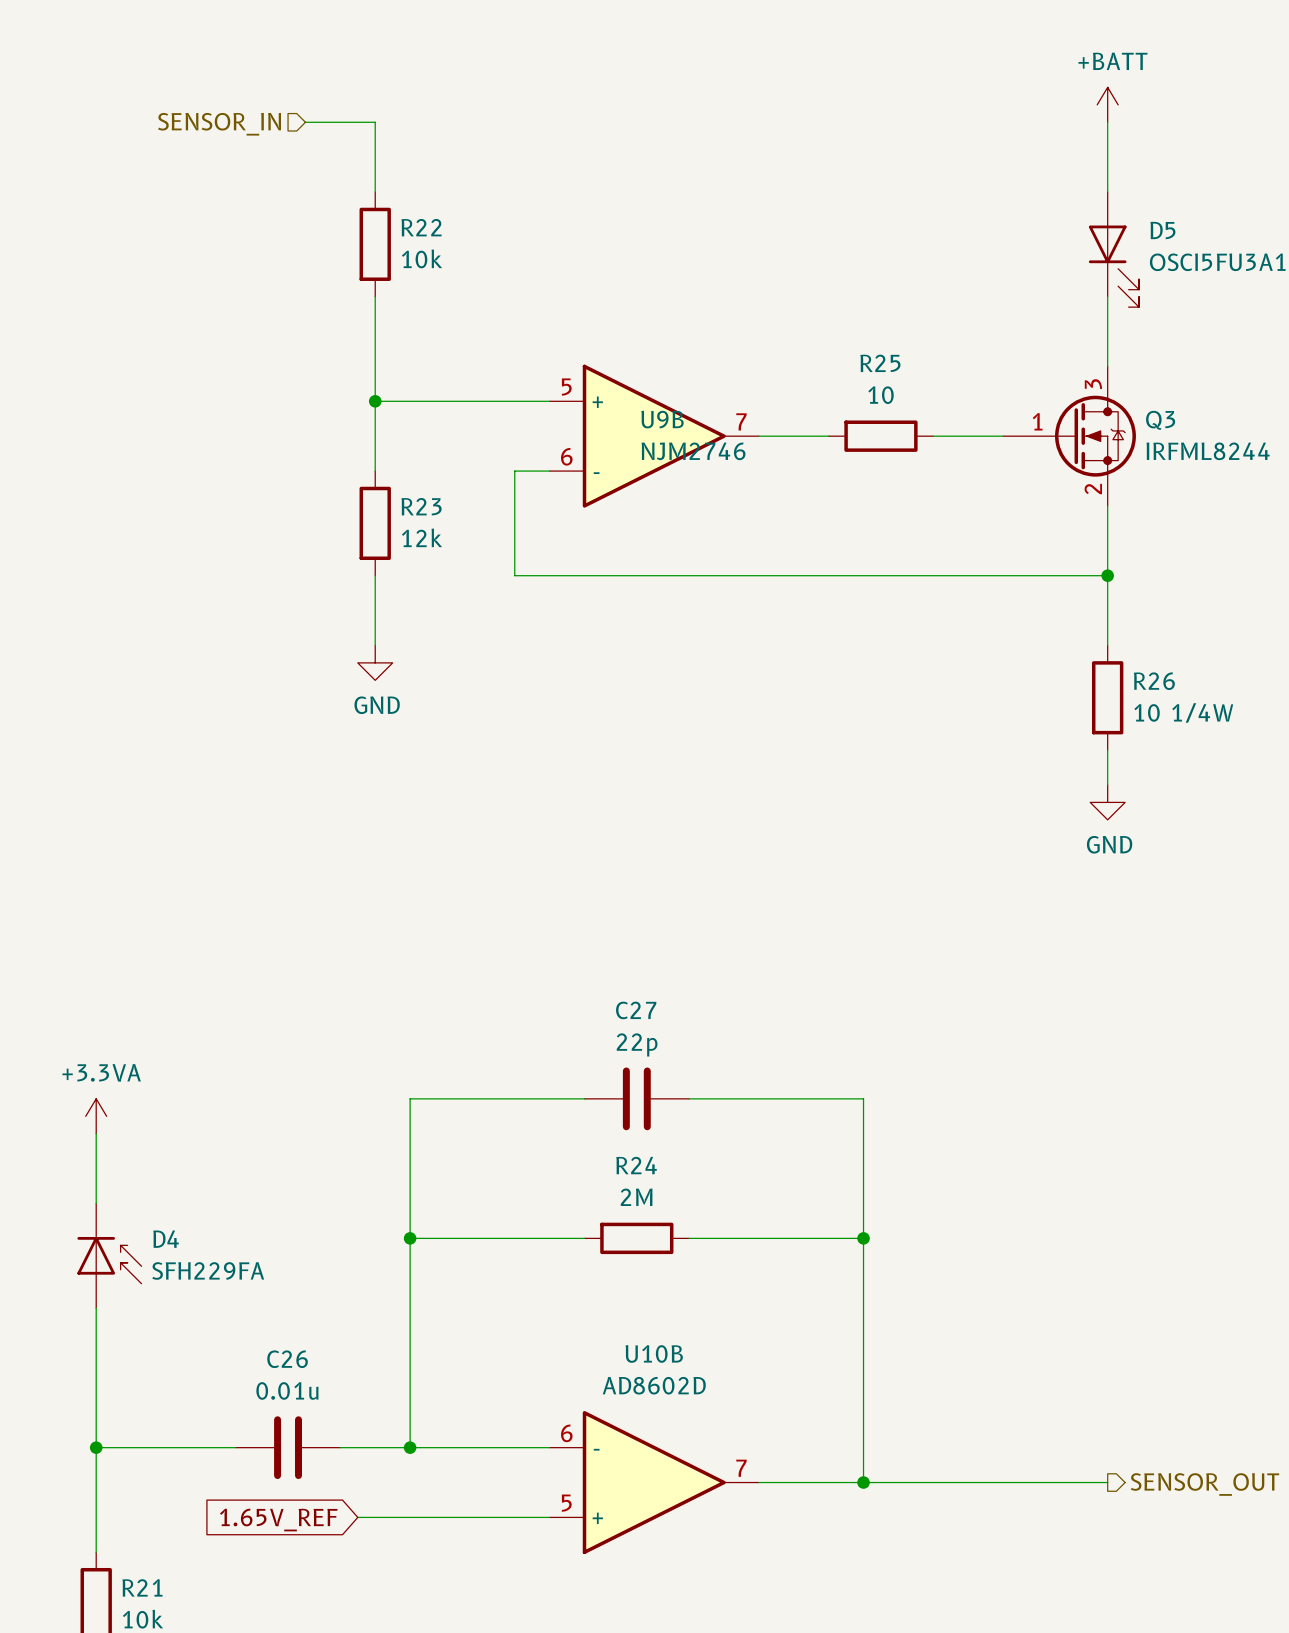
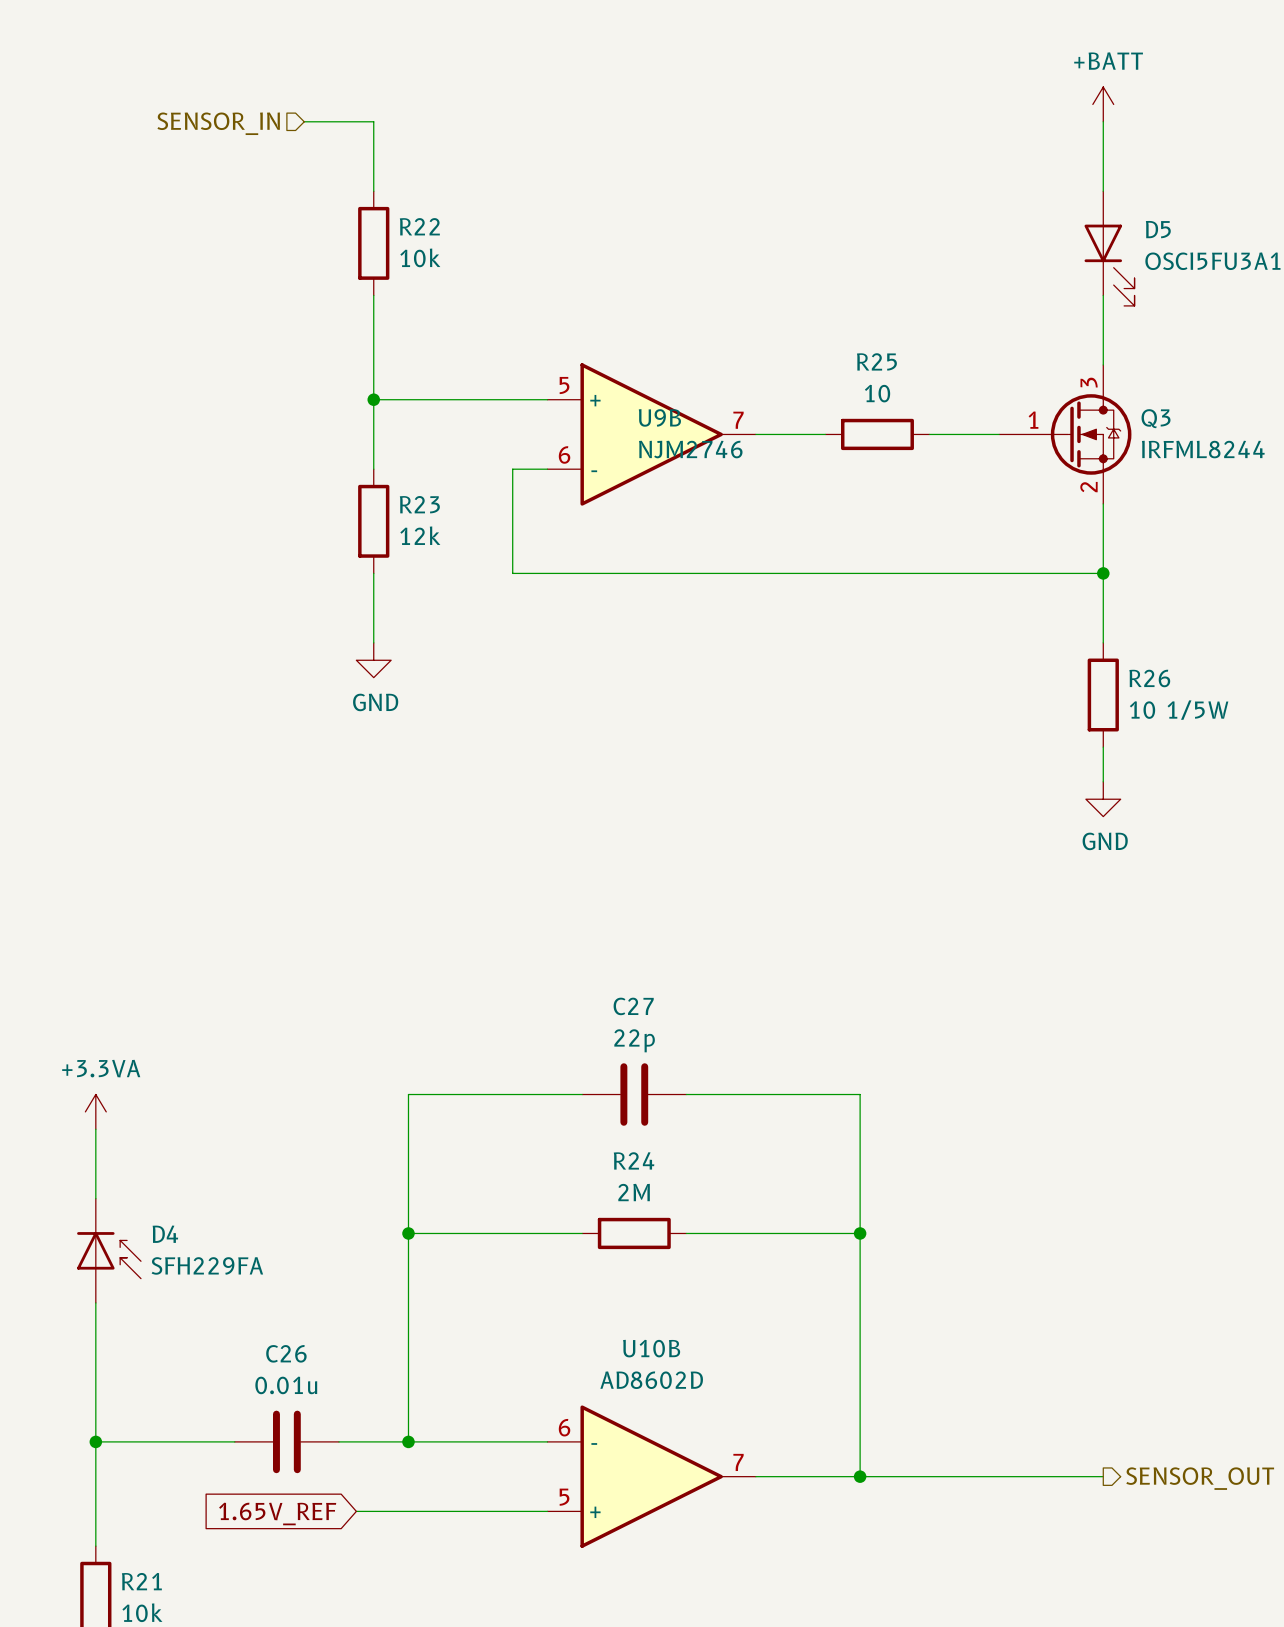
R26 value: 10 1/4W (1183, 712) -> 10 1/5W (1179, 710)

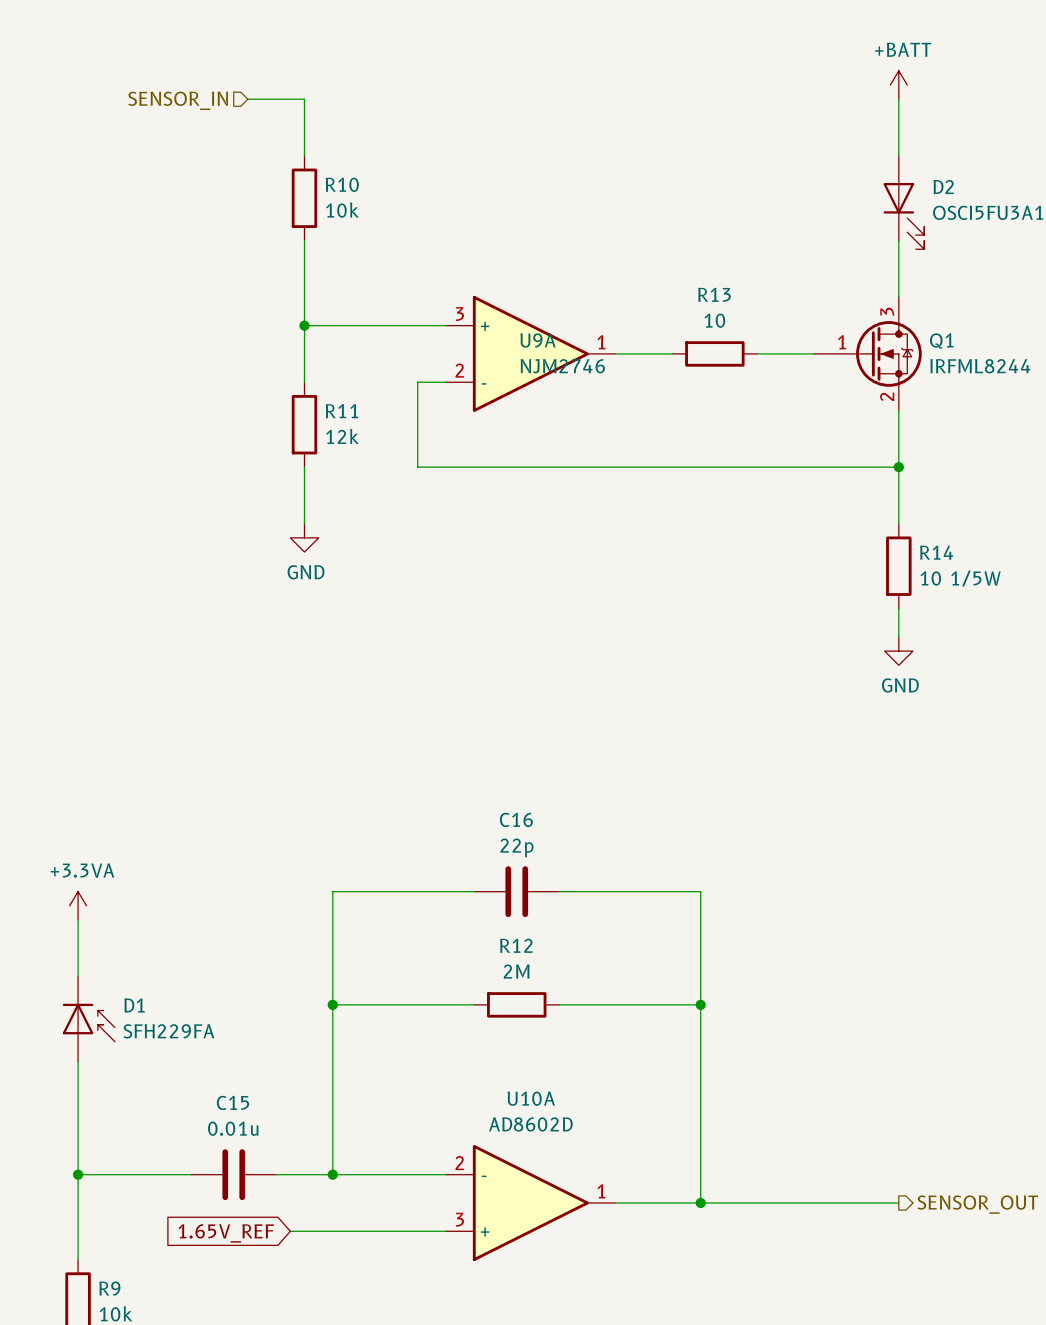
R22 name: R22 (419, 226) -> R10 (342, 184)
D5 name: D5 (1158, 229) -> D2 (943, 187)
R25 name: R25 (876, 361) -> R13 (714, 294)
U9B pin number: 5 (564, 385) -> 3 (459, 314)
U9B name: U9B (659, 417) -> U9A (538, 340)
Q3 name: Q3 (1156, 418) -> Q1 (941, 341)
U9B pin number: 7 (738, 420) -> 1 (601, 342)
U9B pin number: 6 (564, 454) -> 2 (459, 370)
R23 name: R23 (419, 504) -> R11 (342, 411)
R26 name: R26 (1149, 678) -> R14 (936, 552)
C27 name: C27 (633, 1006) -> C16 (516, 819)
R24 name: R24 (634, 1160) -> R12 (516, 945)
D4 name: D4 (165, 1234) -> D1 (134, 1005)
U10B name: U10B (651, 1348) -> U10A (531, 1098)
C26 name: C26 (286, 1353) -> C15 (232, 1102)
U10B pin number: 6 (564, 1427) -> 2 (459, 1163)
U10B pin number: 7 (738, 1462) -> 1 (601, 1191)
U10B pin number: 5 (564, 1497) -> 3 (459, 1219)
R21 name: R21 (141, 1581) -> R9 (109, 1288)

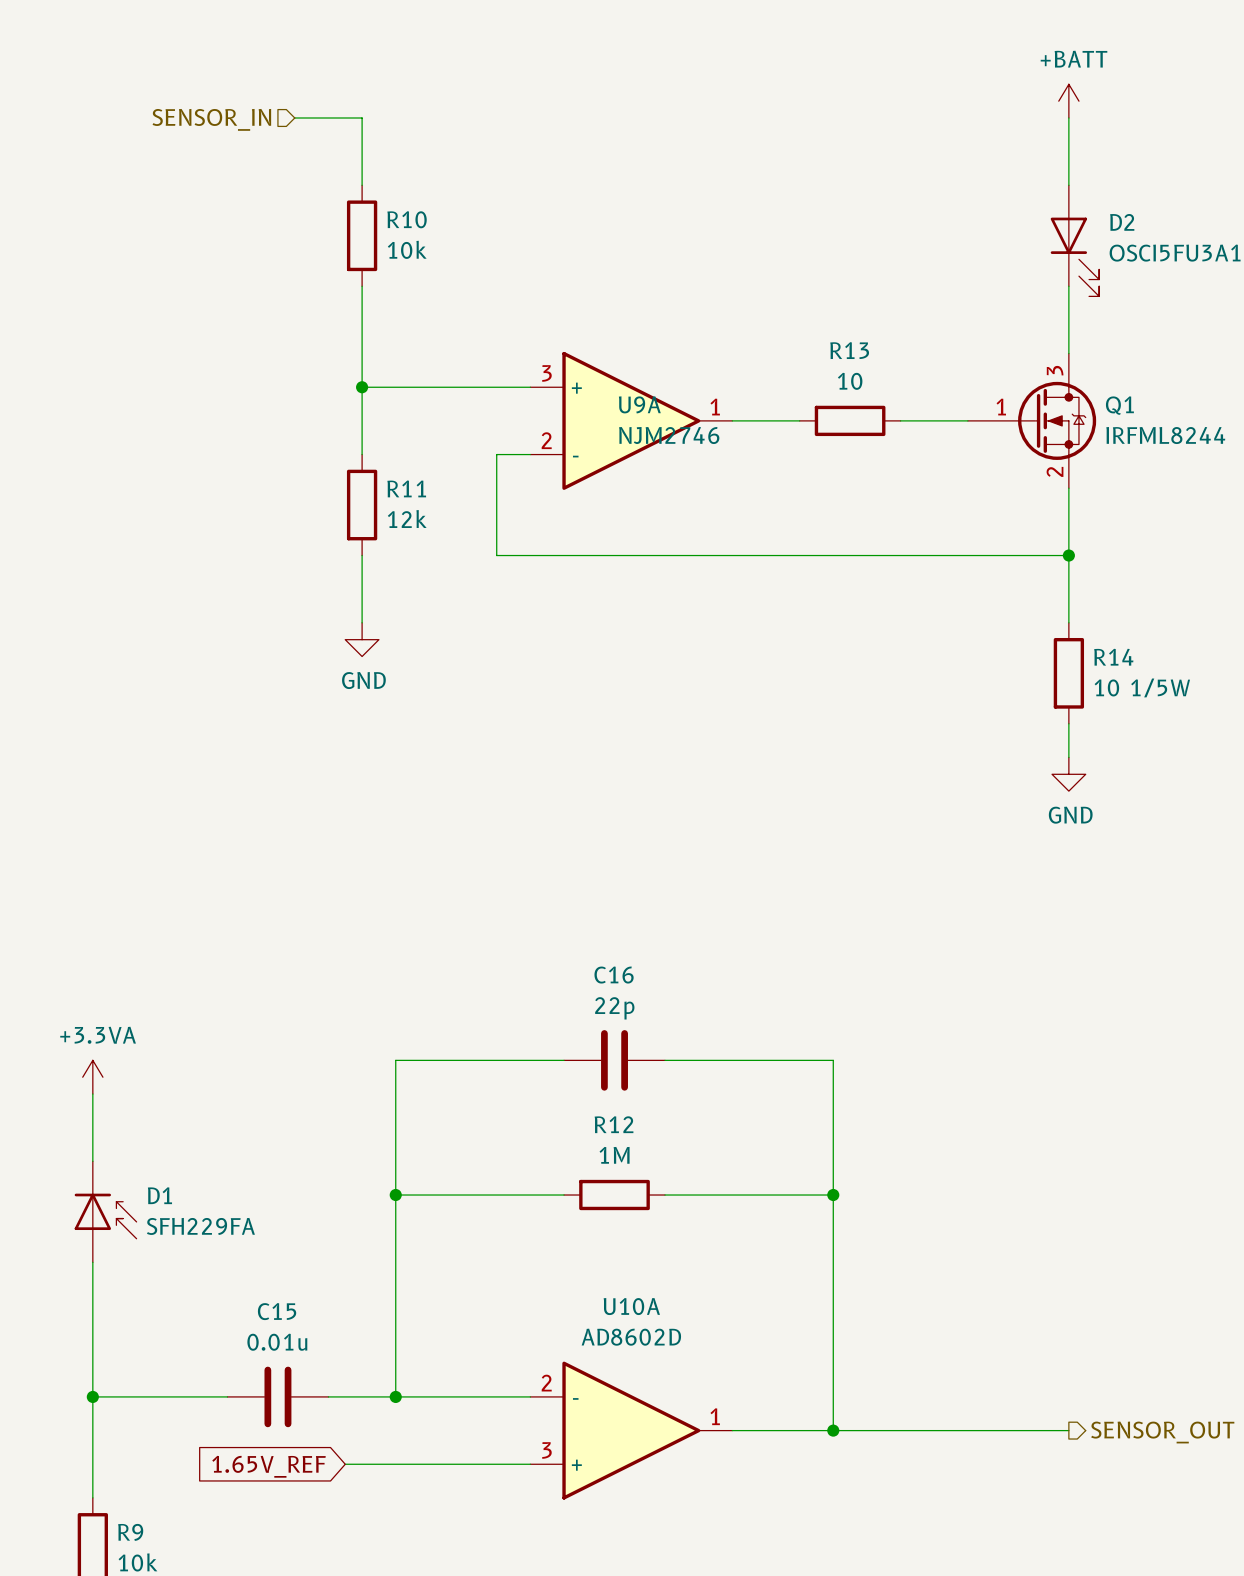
R12 value: 2M (516, 971) -> 1M (614, 1155)

